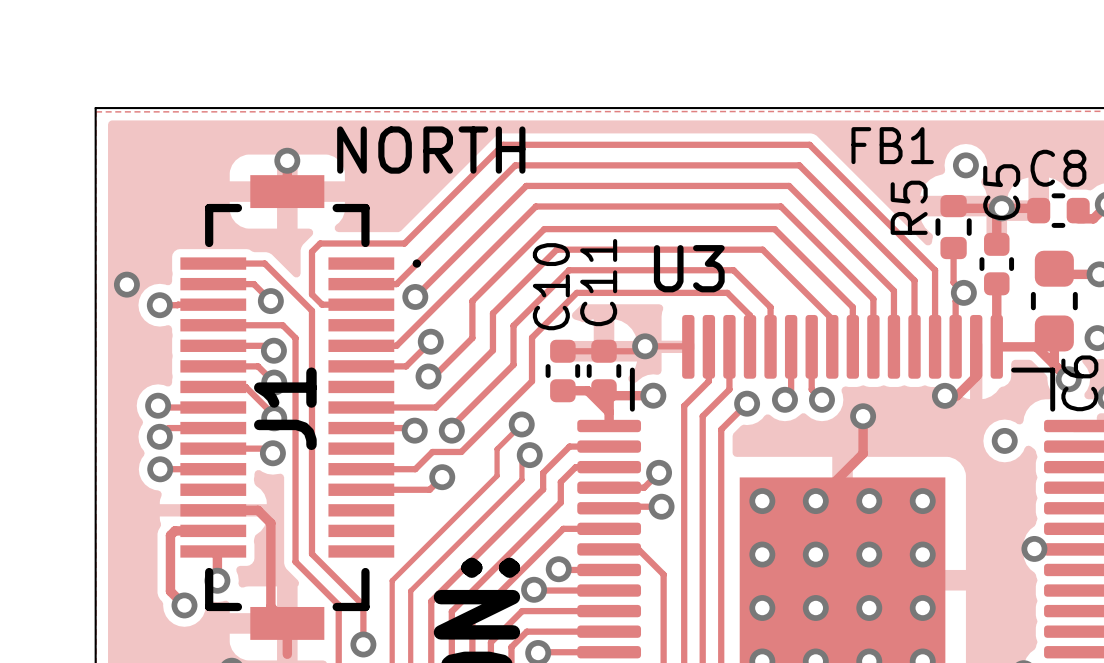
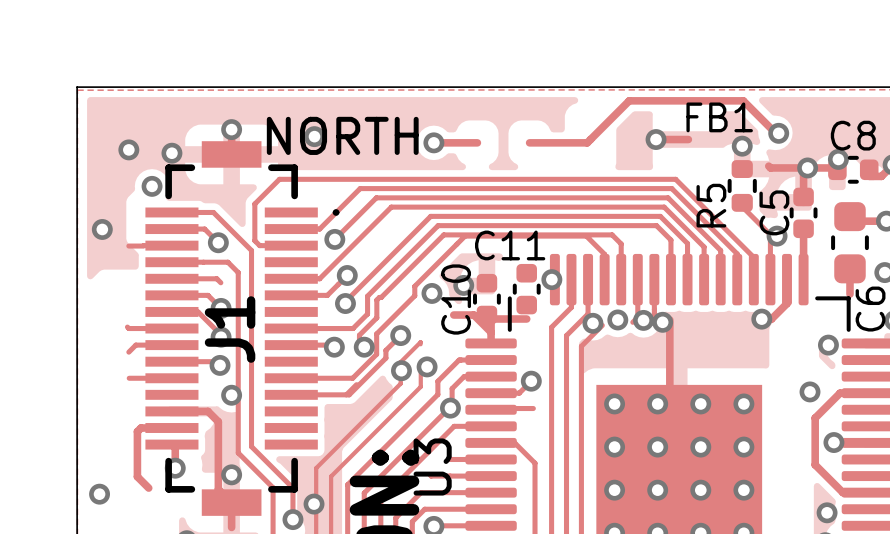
text position: NORTH (431, 150) -> NORTH (342, 135)
track: none -> (775, 132) (743, 100) (629, 100) (587, 142) (529, 142)
via: none -> (314, 136)
track: none -> (656, 139) (688, 139)
via: none -> (656, 139)
track: none -> (433, 142) (477, 142)
via: none -> (433, 142)
via: none -> (742, 146)
via: none -> (128, 149)
via: none -> (171, 153)
C5 name position: C5 (1001, 192) -> C5 (774, 212)
via: none -> (838, 159)
R5 name position: R5 (909, 207) -> R5 (711, 205)
R5 position: (953, 227) -> (742, 185)
via: none -> (152, 186)
track: (446, 233) (515, 165) (799, 165) (914, 280) (914, 315) -> (360, 188) (671, 188) (737, 253)
track: (466, 245) (526, 185) (789, 185) (893, 290) (893, 310) -> (376, 197) (668, 197) (720, 250)
track: (953, 248) (953, 282) (963, 292) (955, 301) -> (742, 202) (742, 206) (770, 234) (770, 242)
track: (485, 256) (535, 206) (780, 206) (873, 299) (873, 306) -> (391, 207) (664, 207) (704, 247)
U3 name rotation: 0° (689, 268) -> 90° counterclockwise (432, 466)
U3 name position: U3 (689, 268) -> U3 (432, 466)
C11 name: C11 (598, 282) -> C10 (456, 299)
track: (316, 298) (311, 294) (311, 251) (320, 243) (404, 243) (503, 144) (809, 144) (935, 270) (935, 319) -> (254, 240) (254, 203) (279, 179) (675, 179) (753, 257)
via: (159, 305) -> none
track: (770, 307) (733, 270) (569, 270) (513, 325) (513, 364) (451, 426) (451, 430) -> (621, 247) (621, 243) (612, 234) (443, 234) (376, 300) (376, 317) (359, 335) (359, 347)
track: (852, 307) (774, 229) (544, 229) (472, 301) (472, 338) (433, 376) (428, 376) -> (687, 247) (687, 243) (660, 216) (430, 216) (343, 303) (343, 309)
track: (832, 319) (762, 249) (556, 249) (492, 313) (492, 350) (435, 407) -> (670, 257) (670, 240) (656, 225) (438, 225) (367, 296) (367, 314) (351, 328)
track: (532, 337) (532, 381) (497, 416) -> (428, 272) (414, 286) (414, 295) (376, 333) (376, 354) (352, 378) (334, 378)
via: (645, 346) -> none
via: none -> (551, 279)
track: (687, 346) (645, 346) (640, 351) (562, 351) -> none
track: (996, 346) (1036, 346) (1068, 379) -> none
via: (273, 350) -> none
via: none -> (463, 285)
C11: none -> (526, 289)
via: none -> (431, 293)
C10: (562, 371) -> none
via: (1068, 379) -> none
via: (653, 395) -> none
via: none -> (617, 319)
via: none -> (643, 320)
via: (784, 399) -> none
via: none -> (592, 323)
via: (747, 403) -> none
via: (158, 405) -> none
track: (863, 416) (863, 453) (830, 486) -> (669, 319) (669, 391)
via: (863, 416) -> none
via position: (521, 424) -> (400, 335)
track: (478, 434) (461, 451) (432, 451) (415, 469) -> (385, 350) (385, 358) (349, 394) (346, 394)
via: (159, 436) -> none
via position: (1004, 440) -> (828, 345)
via: none -> (401, 370)
via: (160, 469) -> none
via: (442, 477) -> none
via: none -> (810, 391)
track: none -> (867, 393) (840, 393) (815, 418) (815, 464) (842, 492) (867, 492)
via: none -> (231, 395)
via: none -> (450, 408)
via: (661, 506) -> none
via: (558, 569) -> none
via: none -> (231, 474)
via: (534, 589) -> none
via: (184, 605) -> none
via: none -> (99, 494)
via: none -> (314, 504)
via: none -> (827, 512)

